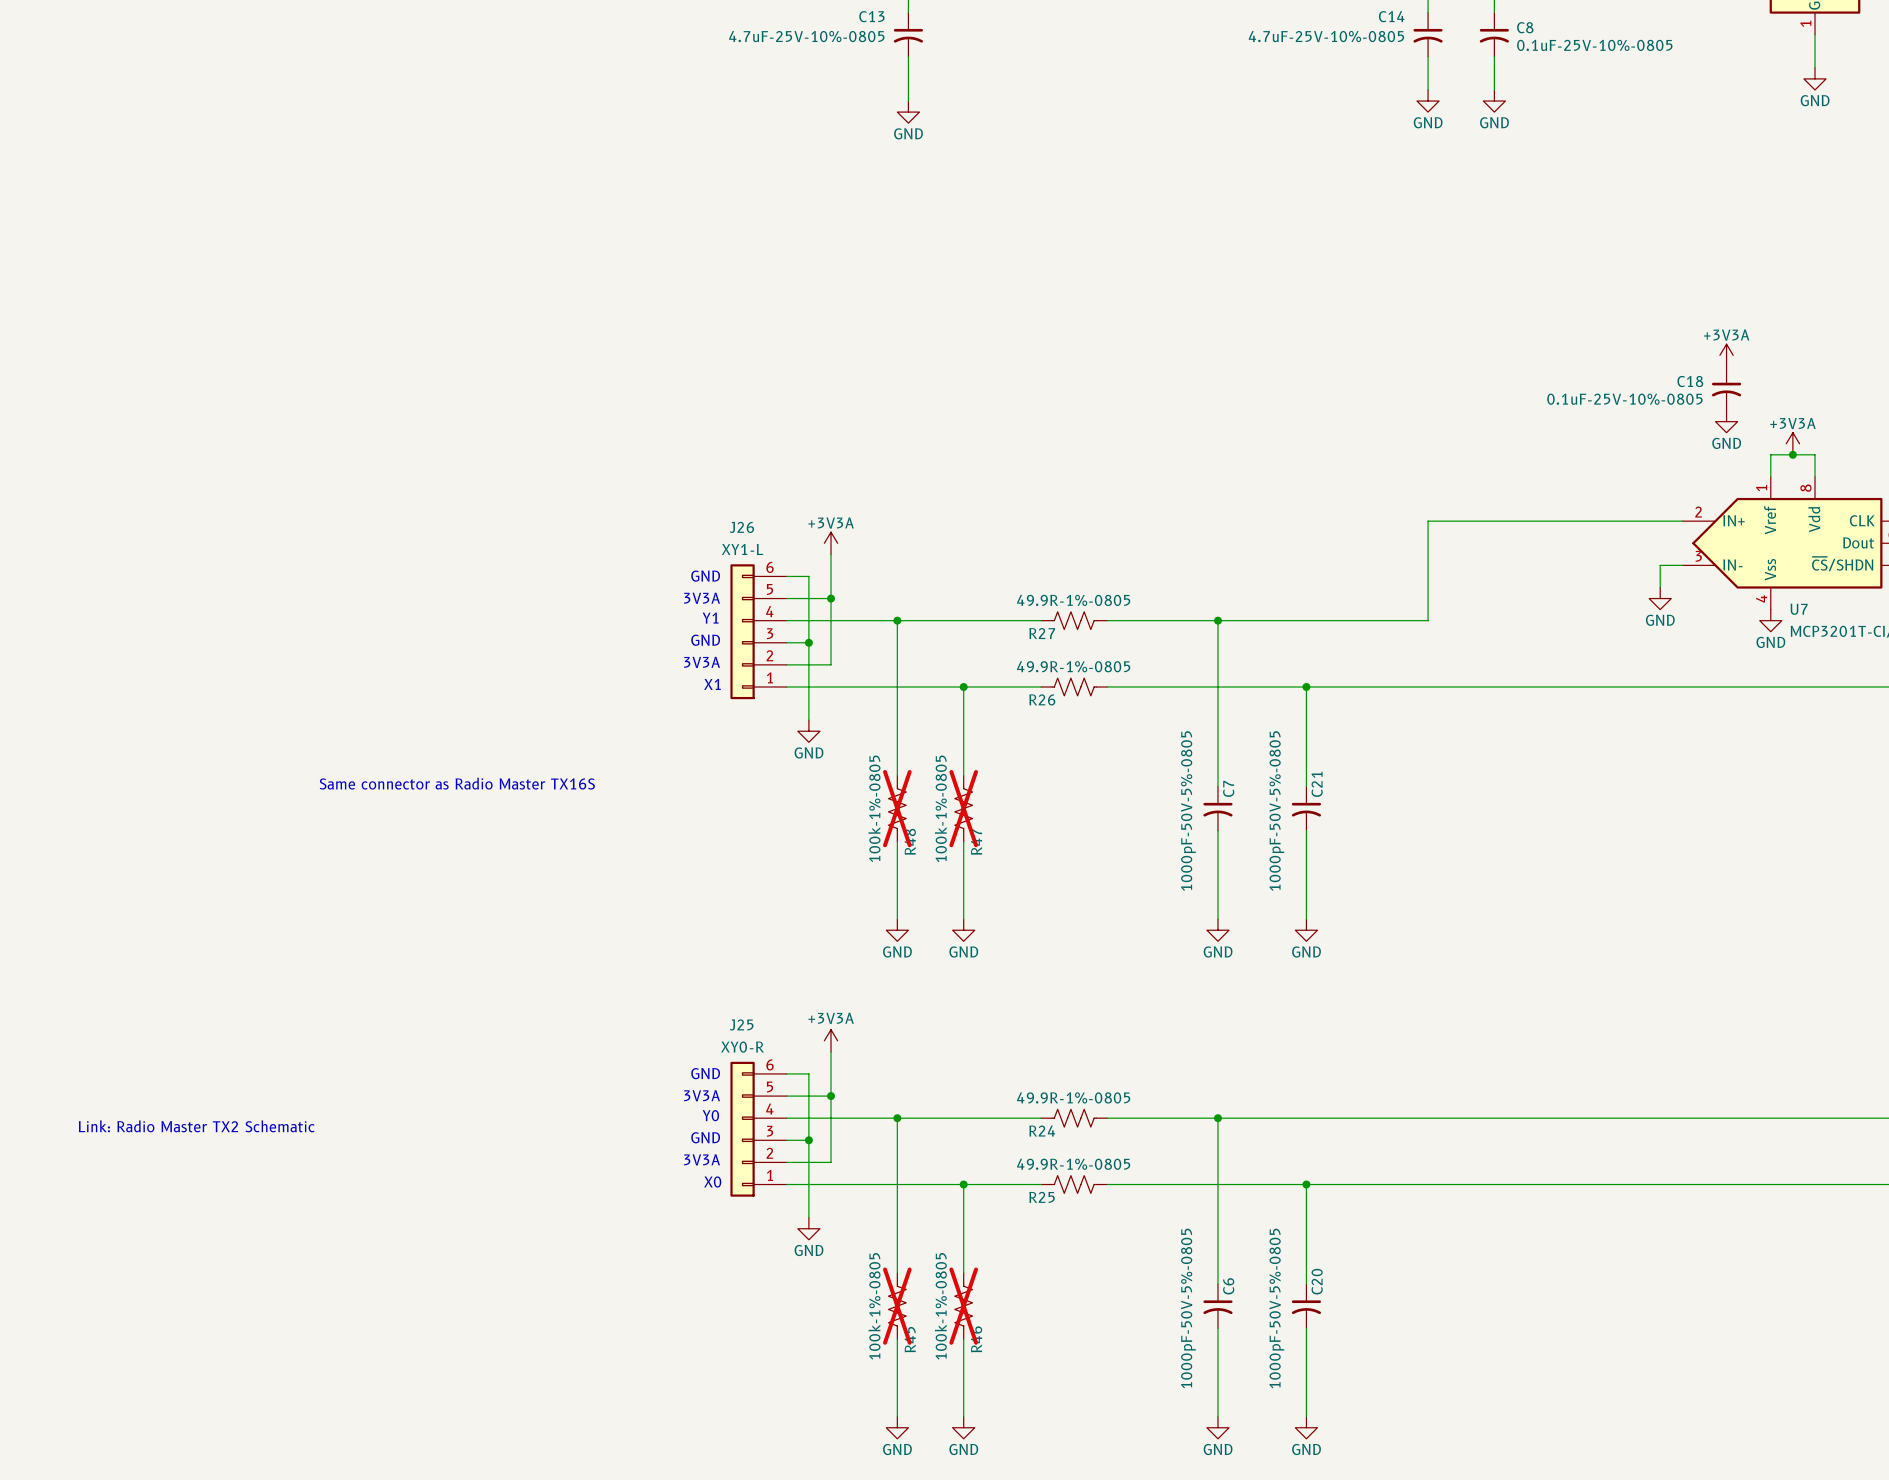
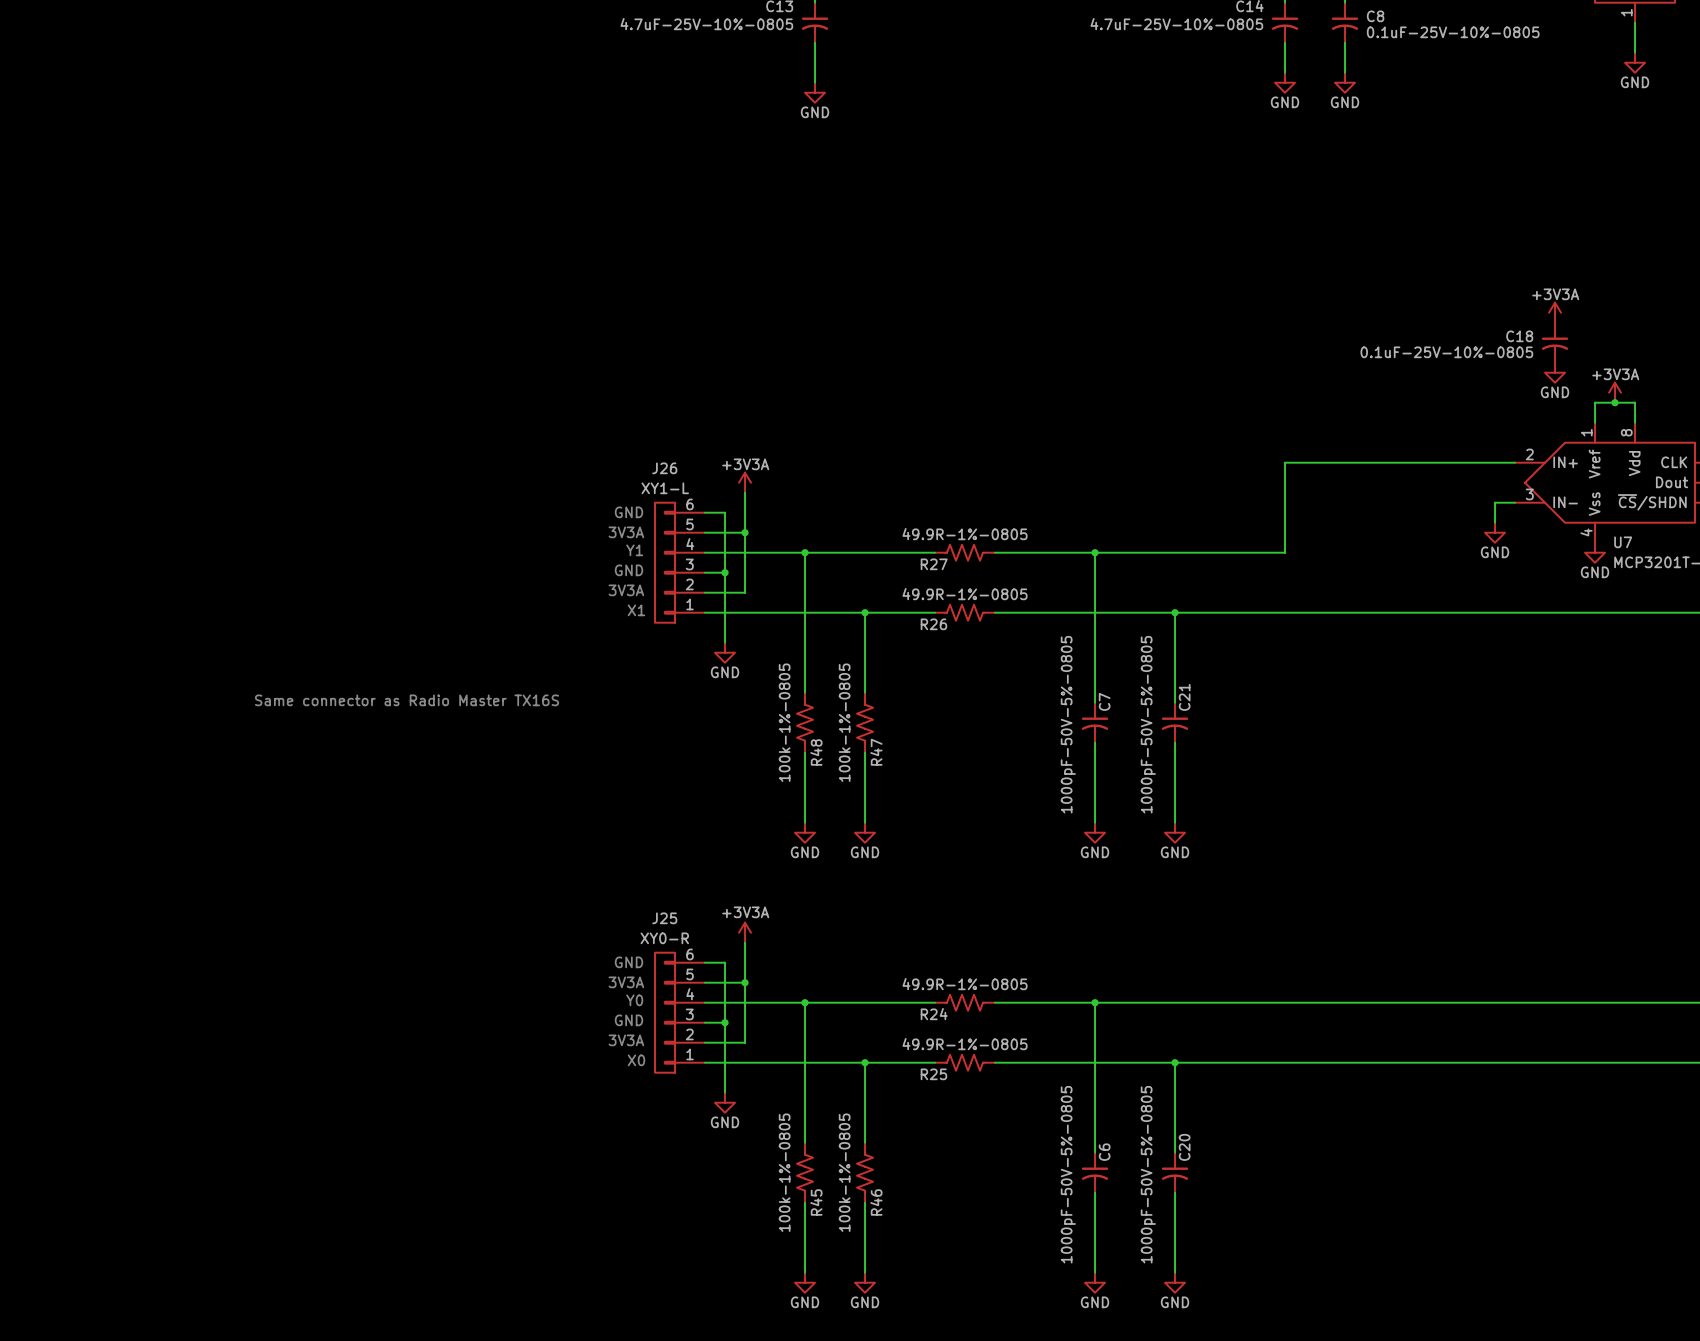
R48 do-not-place cross: (897, 808) -> none
R47 do-not-place cross: (963, 808) -> none
text: Link: Radio Master TX2 Schematic (196, 1126) -> none
R45 do-not-place cross: (897, 1306) -> none
R46 do-not-place cross: (963, 1306) -> none

